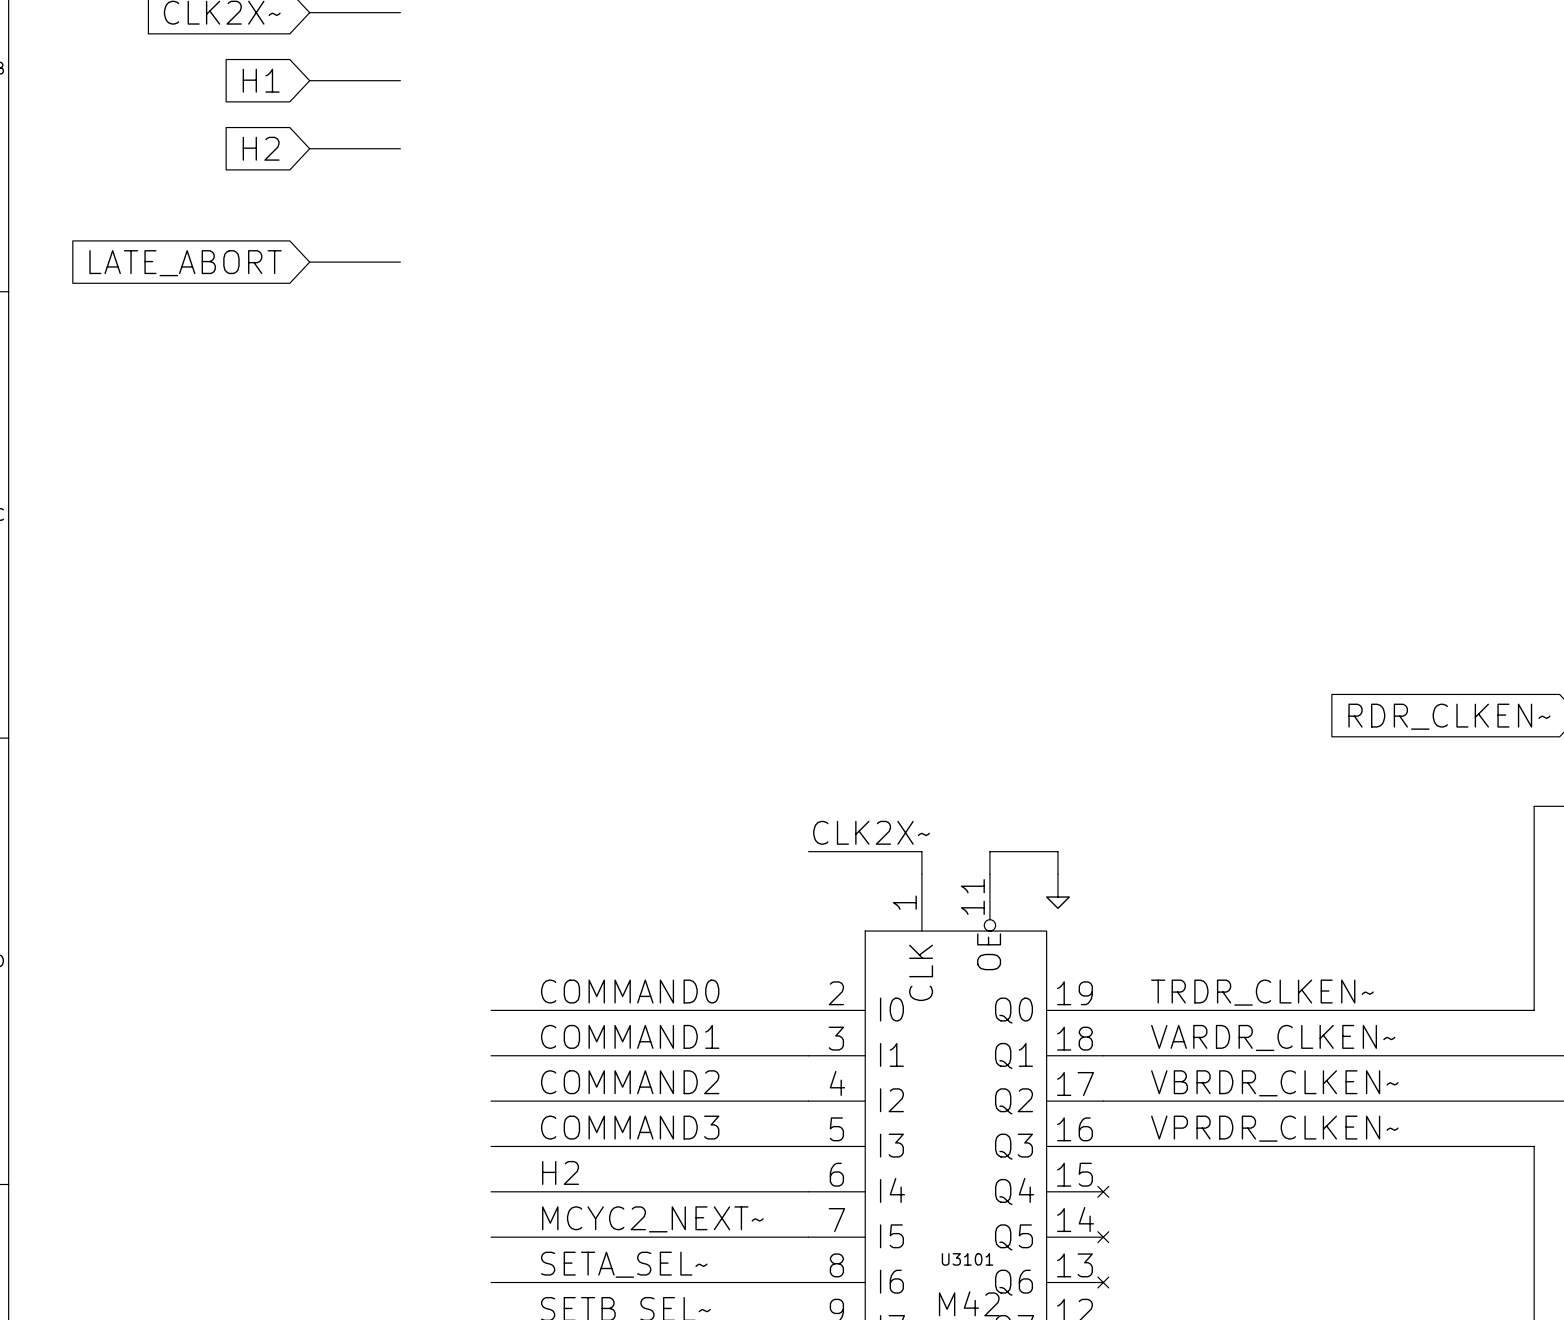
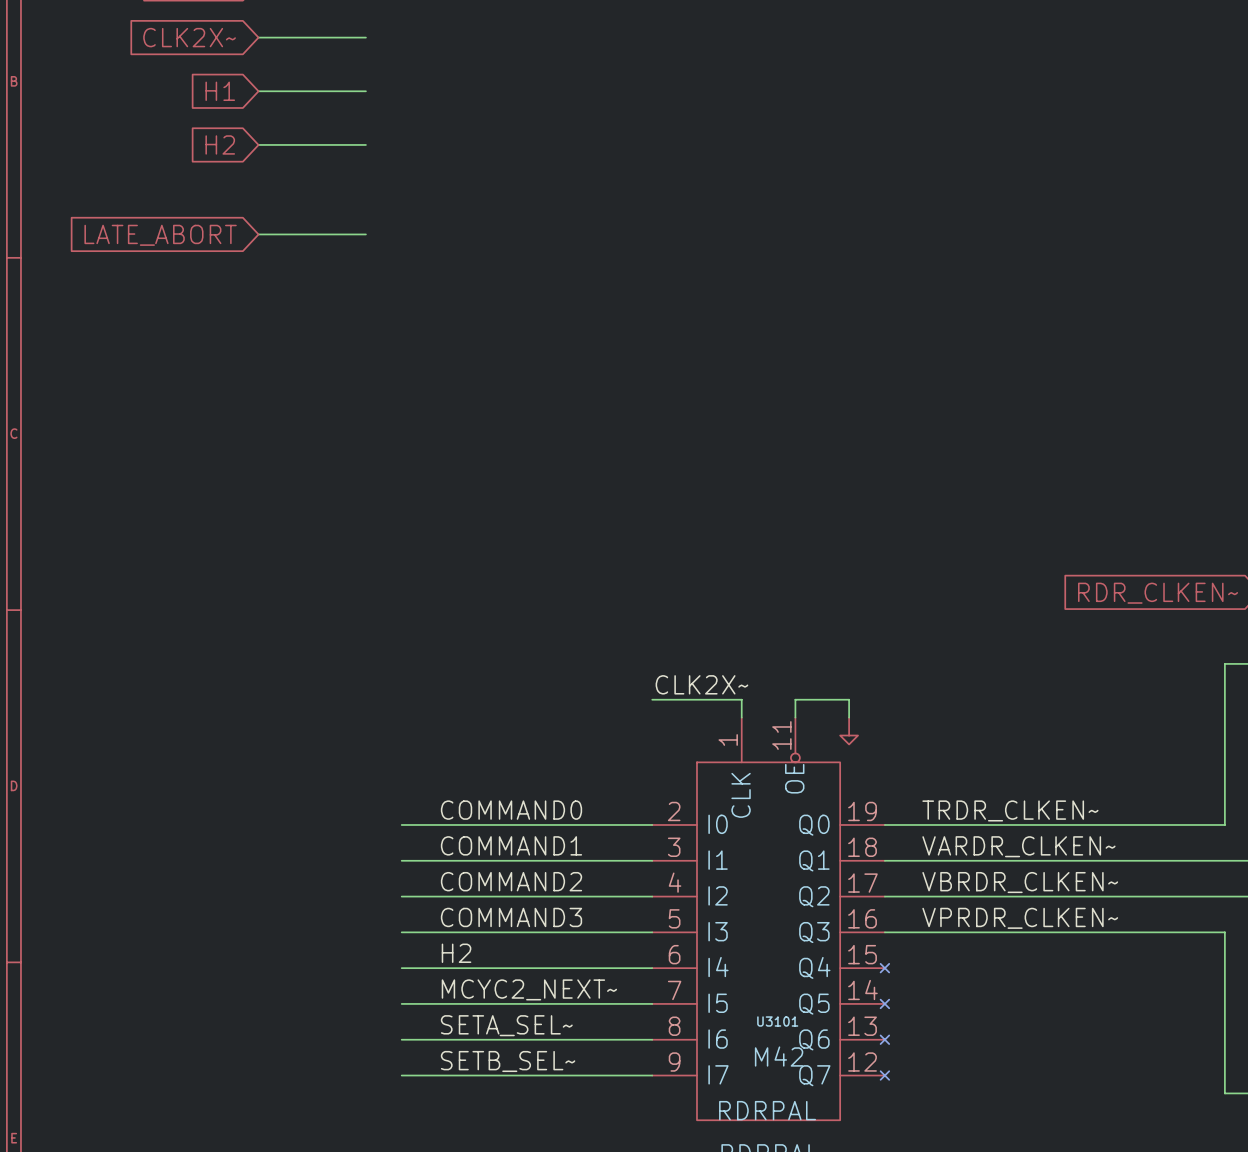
wire: none -> (330, 37) (365, 37)
wire: none -> (330, 91) (365, 91)
wire: none -> (330, 144) (365, 144)
wire: none -> (330, 234) (365, 234)

